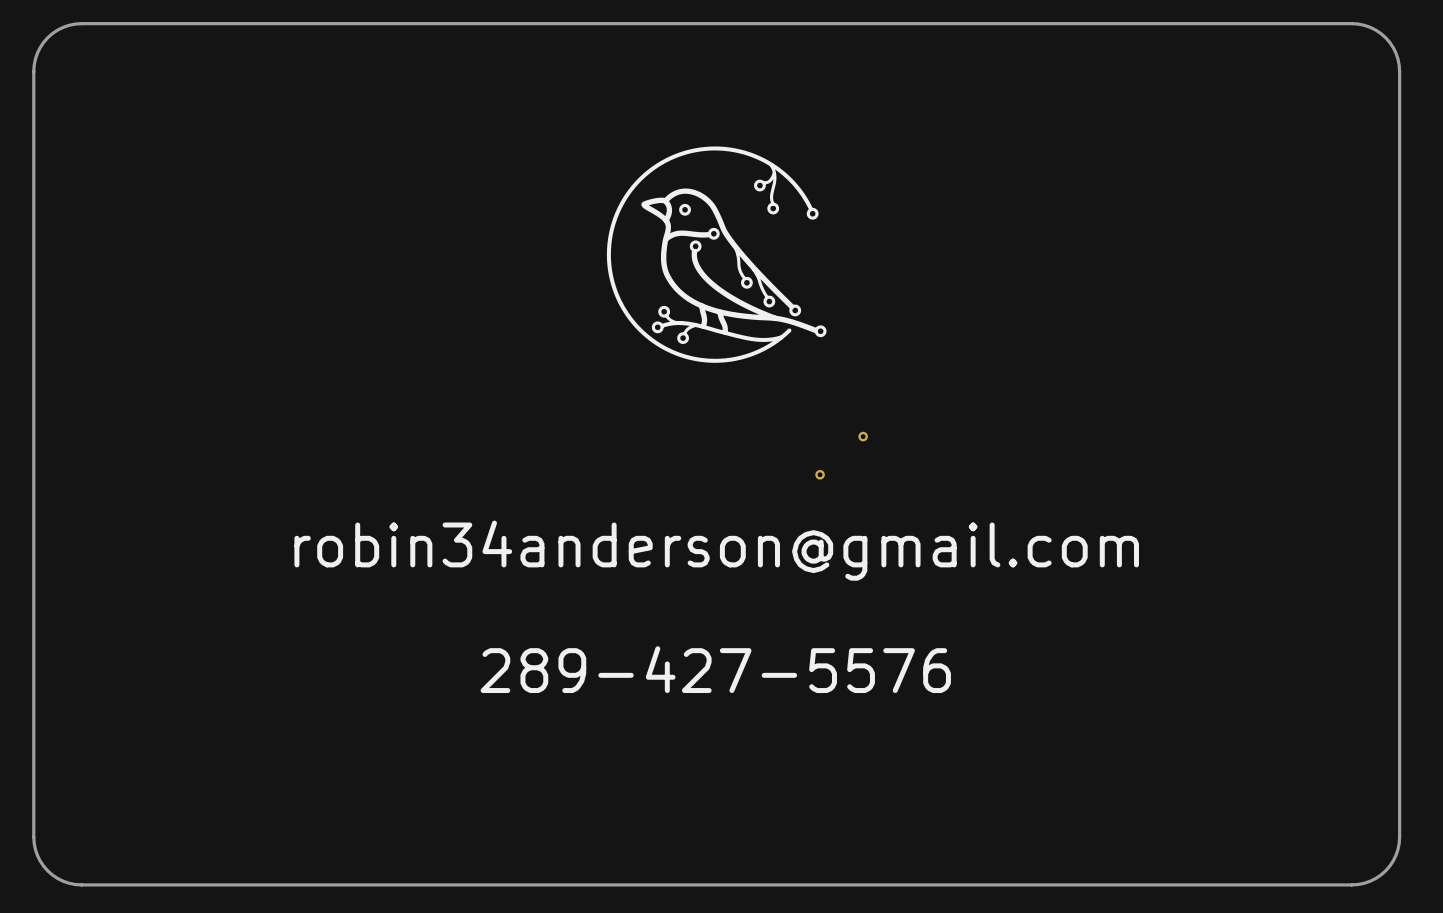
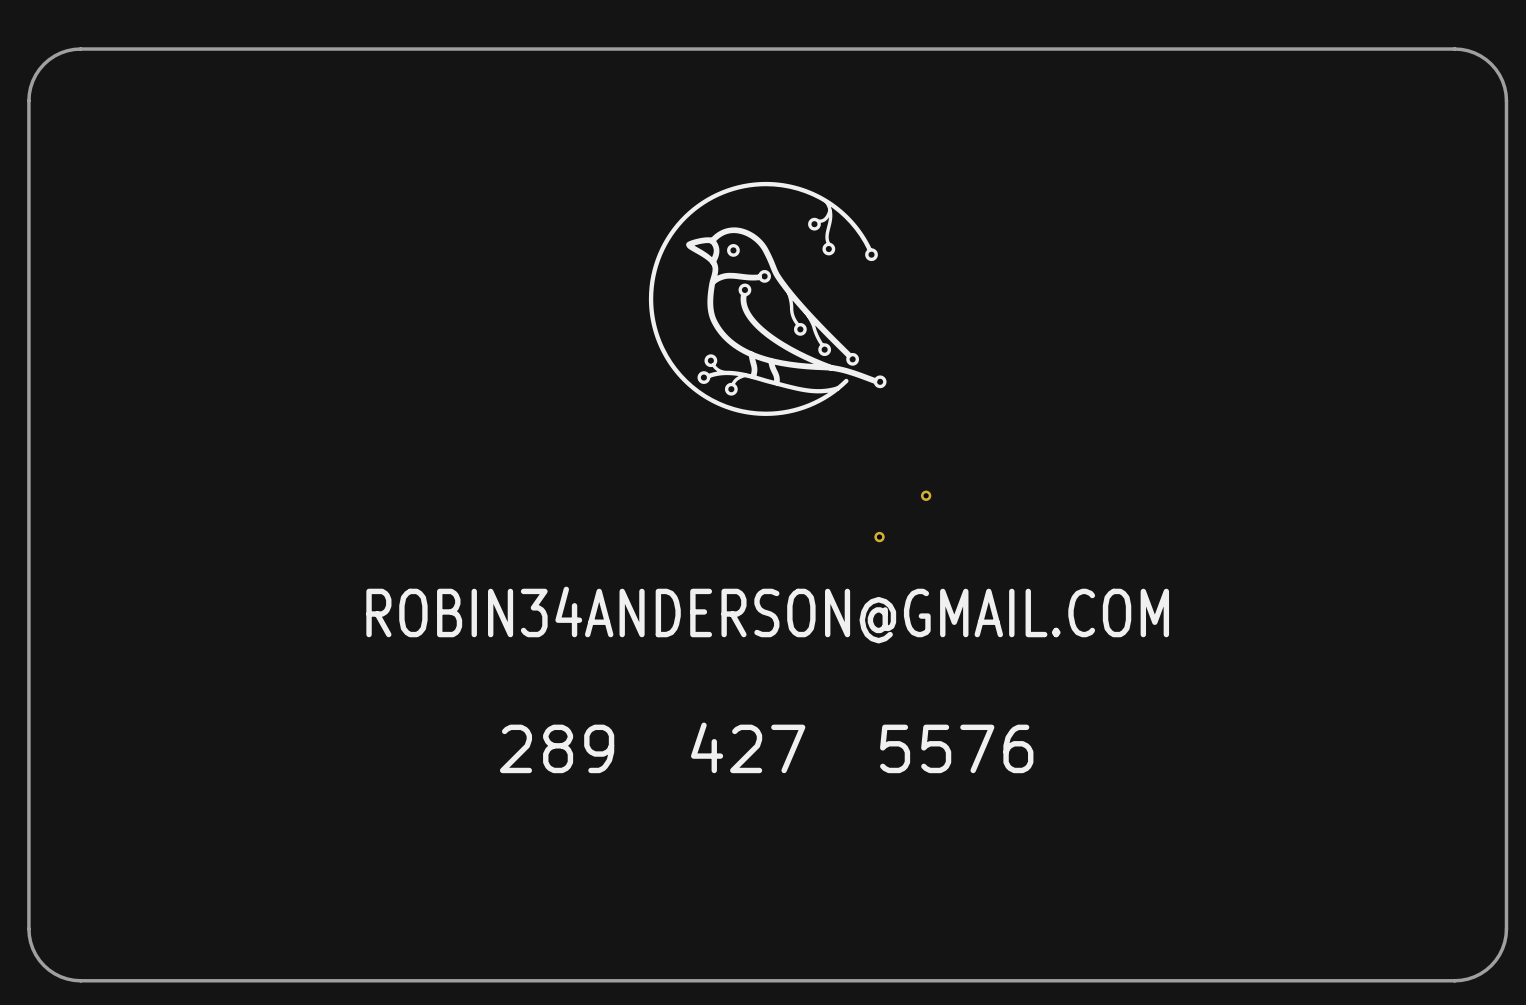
text: robin34anderson@gmail.com (716, 550) -> ROBIN34ANDERSON@GMAIL.COM (767, 615)
text: 289-427-5576 (715, 669) -> 289 427 5576 (766, 747)

